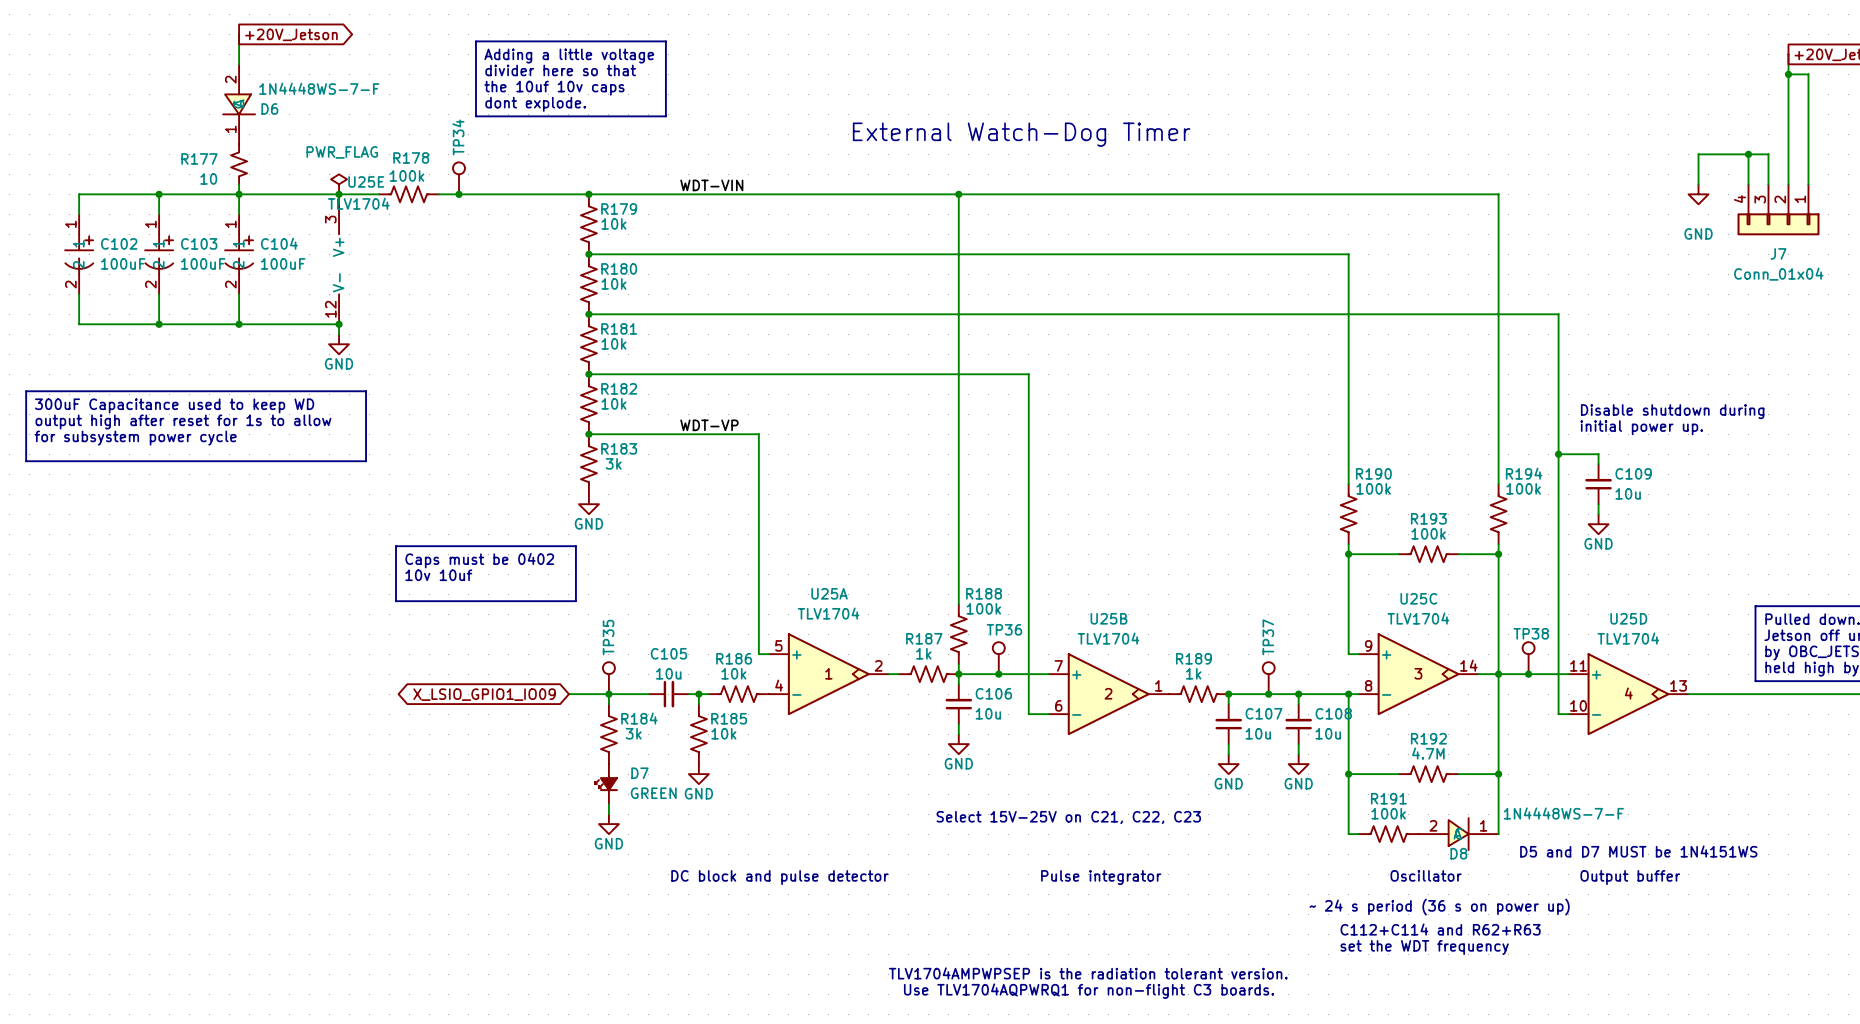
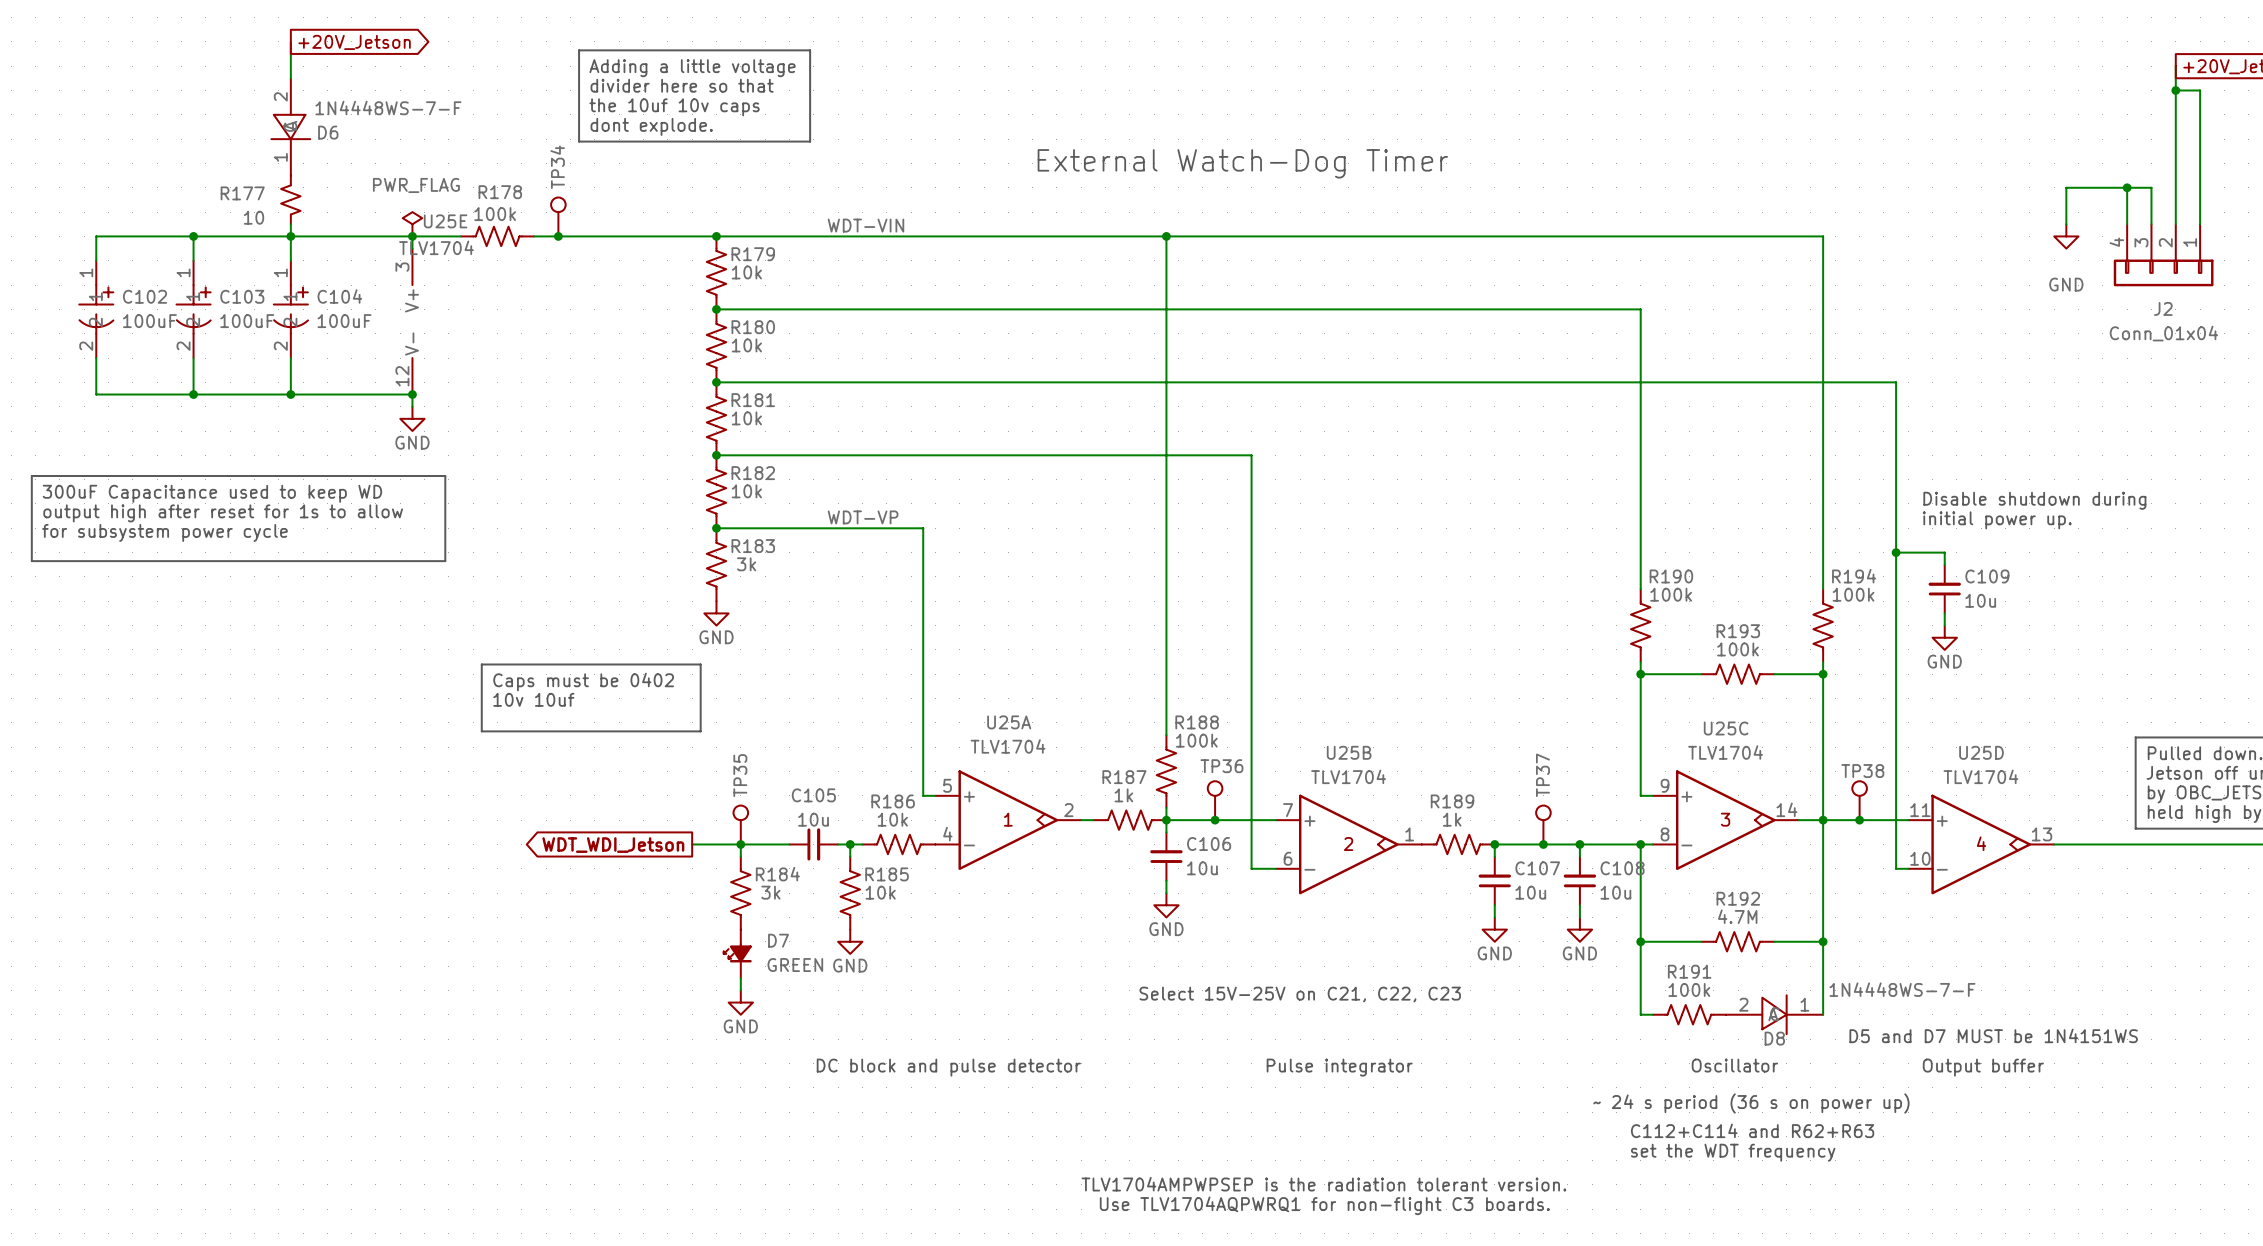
J7 name: J7 (1778, 253) -> J2 (2163, 308)
global label shape: bidirectional (484, 694) -> output (613, 845)
global label: X_LSIO_GPIO1_IO09 (484, 694) -> WDT_WDI_Jetson (613, 845)

